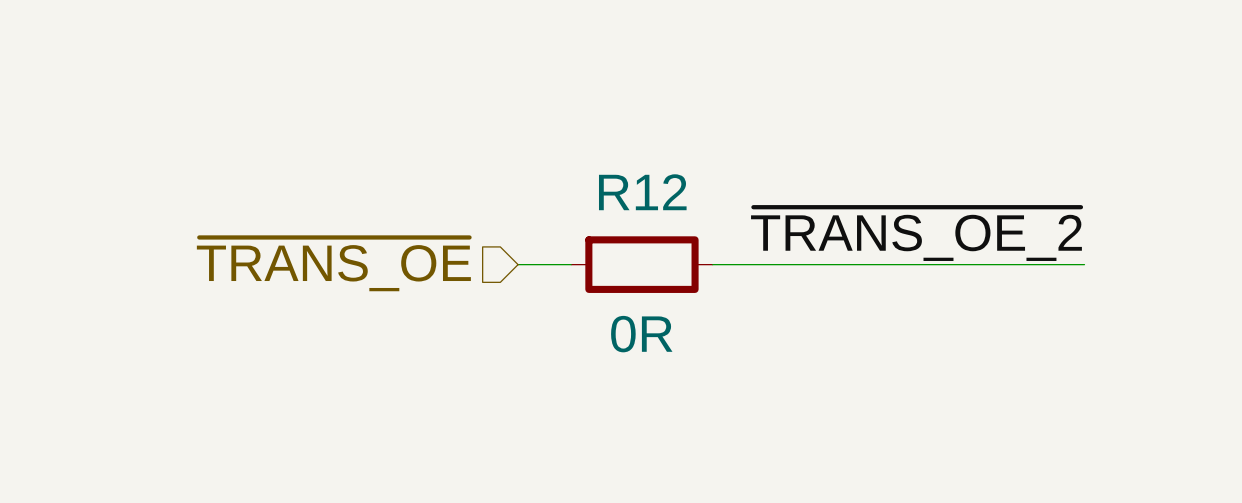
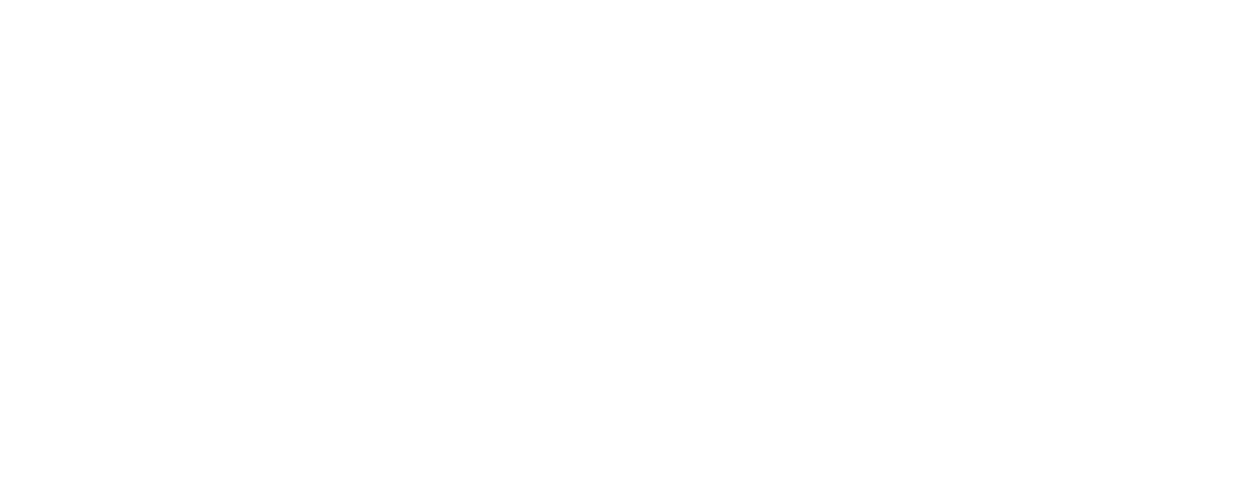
label: ~{TRANS_OE_2} (916, 234) -> none
hierarchical label: ~{TRANS_OE} (333, 264) -> none
wire: (518, 264) (571, 264) -> none
R12: (641, 264) -> none
wire: (712, 264) (1084, 264) -> none

